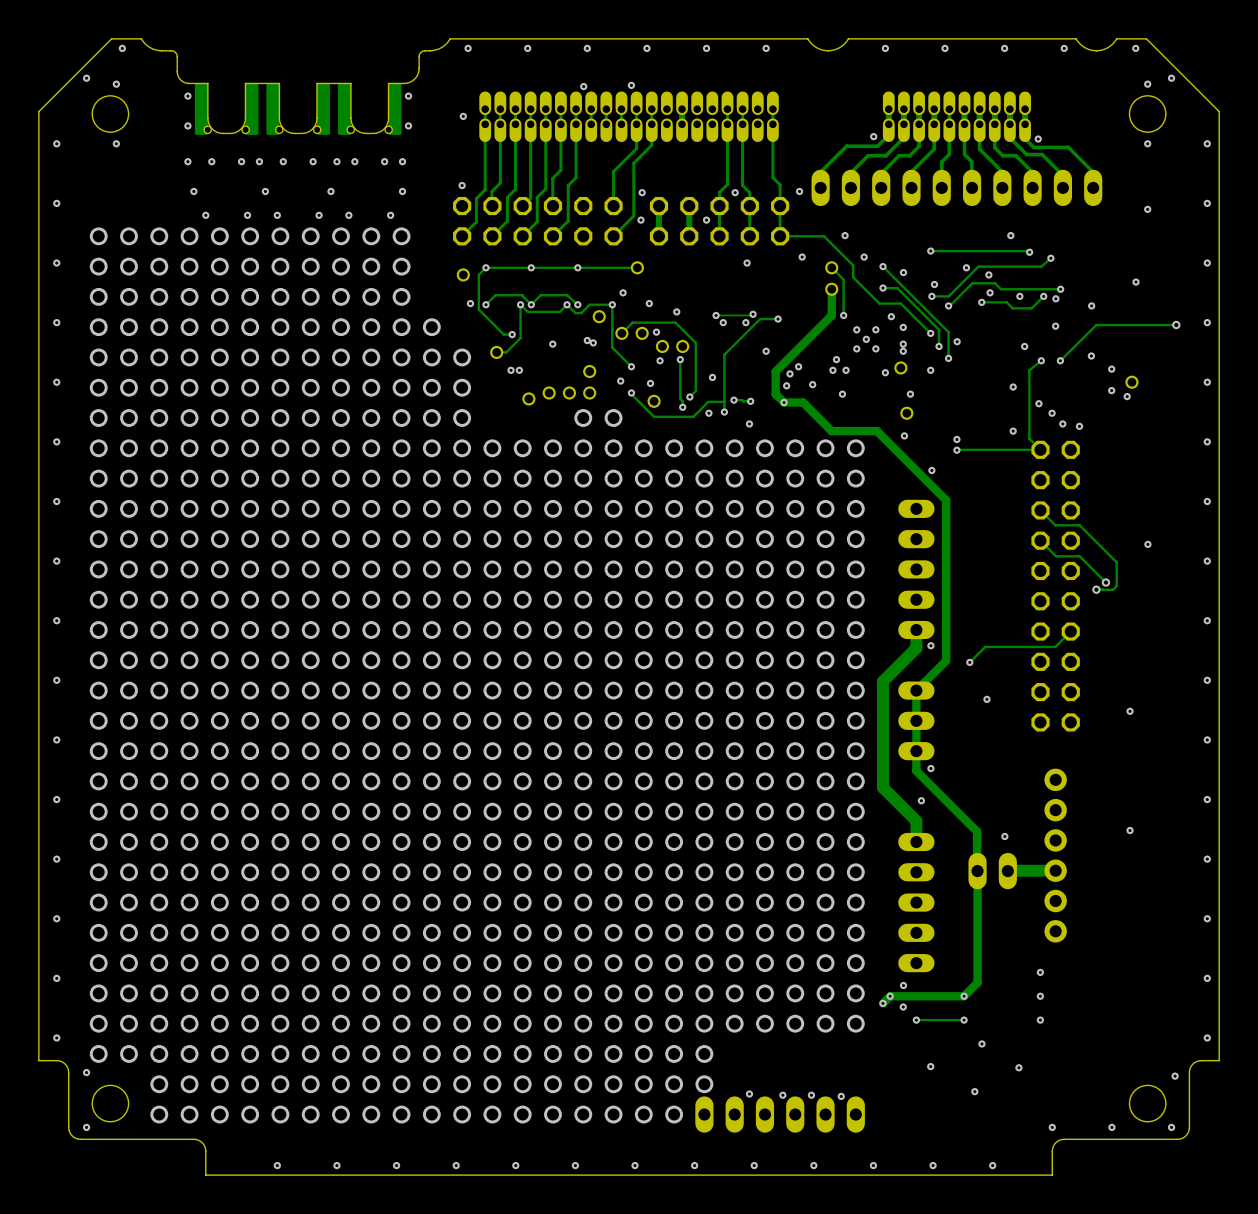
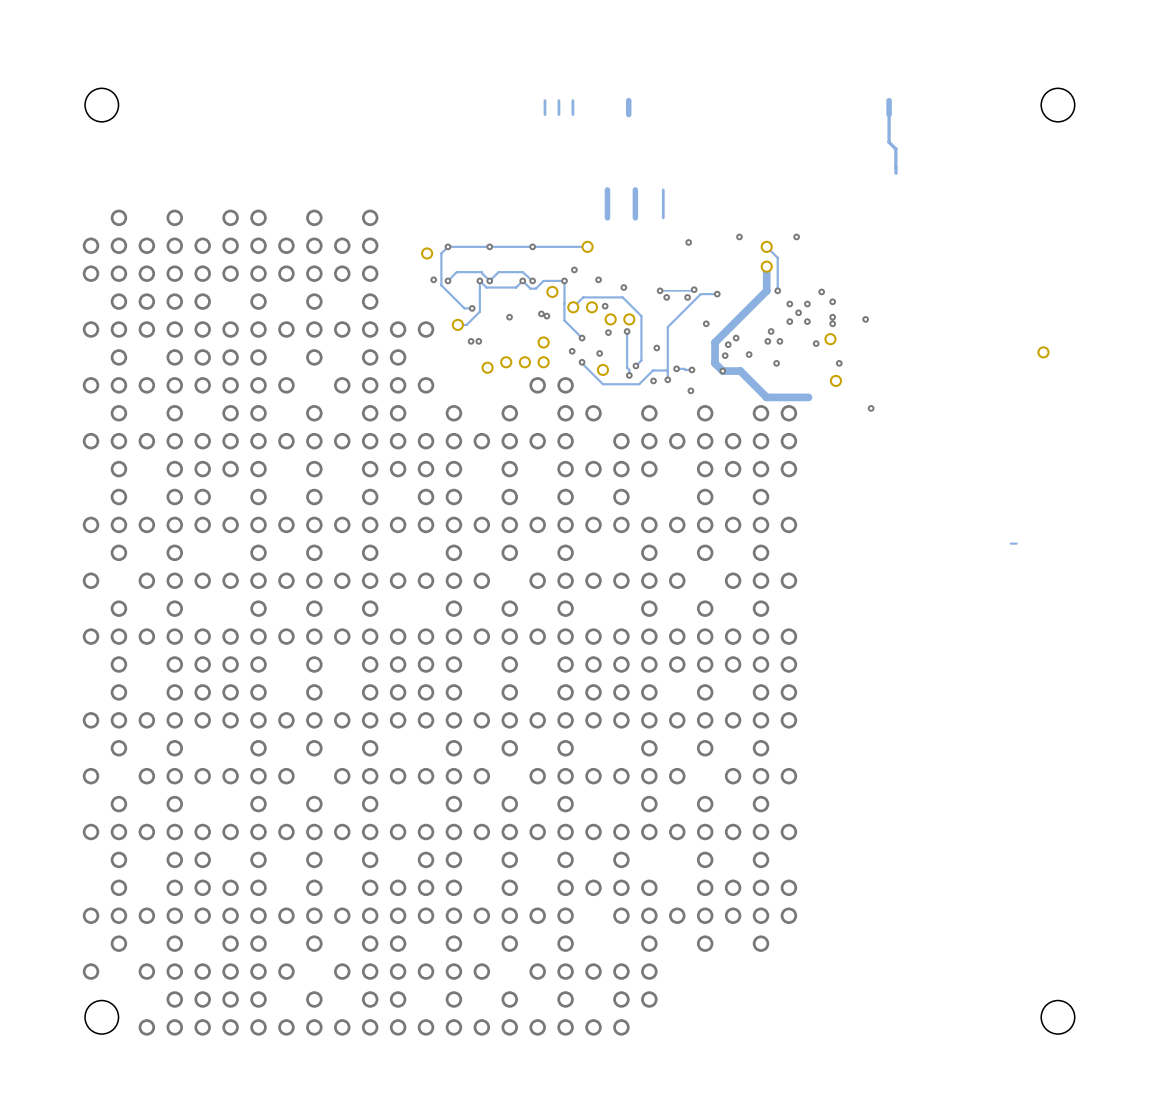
drawing: [38, 38, 1220, 1176] -> none
via: (122, 48) -> none
via: (468, 48) -> none
via: (527, 48) -> none
via: (587, 48) -> none
via: (646, 48) -> none
via: (706, 48) -> none
via: (766, 48) -> none
via: (885, 48) -> none
via: (945, 48) -> none
via: (1004, 48) -> none
via: (1064, 48) -> none
via: (1135, 48) -> none
board edge: (161, 50) (172, 50) (176, 53) (177, 74) (181, 81) (187, 83) (202, 83) -> none
board edge: (429, 50) (423, 51) (419, 53) (418, 72) (414, 79) (407, 82) (393, 83) -> none
via: (86, 78) -> none
via: (1171, 78) -> none
board edge: (274, 83) (250, 83) -> none
board edge: (345, 83) (322, 83) -> none
via: (116, 84) -> none
via: (1147, 84) -> none
via: (631, 85) -> none
via: (583, 86) -> none
via: (187, 96) -> none
via: (408, 96) -> none
part: (226, 109) -> none
part: (298, 109) -> none
part: (369, 109) -> none
track: (485, 109) (485, 189) (476, 198) (476, 222) (462, 236) -> none
track: (500, 109) (500, 183) (491, 191) (492, 206) -> none
track: (515, 109) (515, 189) (507, 197) (507, 221) (492, 236) -> none
track: (530, 109) (530, 198) (522, 206) -> none
track: (545, 109) (545, 188) (537, 197) (537, 221) (522, 236) -> none
track: (560, 109) (560, 170) (552, 178) (552, 206) -> none
track: (576, 109) (576, 177) (568, 185) (568, 221) (552, 236) -> none
track: (636, 109) (636, 148) (613, 171) (613, 206) -> none
track: (651, 109) (651, 145) (633, 163) (633, 216) (613, 236) -> none
track: (727, 109) (727, 184) (719, 192) (719, 205) -> none
track: (742, 109) (742, 185) (749, 192) (749, 236) -> none
track: (772, 109) (772, 177) (780, 184) (780, 236) (824, 236) (853, 265) (853, 277) (879, 303) (900, 303) (930, 333) -> none
track: (888, 109) (888, 135) (877, 146) (846, 146) (820, 172) (820, 187) -> none
track: (903, 109) (903, 137) (885, 155) (868, 155) (850, 173) (850, 187) -> none
track: (919, 109) (919, 146) (909, 155) (899, 155) (881, 173) (881, 187) -> none
track: (934, 109) (934, 149) (911, 171) (911, 187) -> none
track: (949, 109) (949, 154) (941, 161) (941, 187) -> none
track: (979, 109) (979, 149) (1002, 171) (1002, 187) -> none
track: (994, 109) (994, 147) (1002, 155) (1015, 155) (1032, 172) (1032, 187) -> none
track: (1009, 109) (1009, 137) (1026, 154) (1042, 154) (1062, 175) (1062, 187) -> none
track: (1025, 109) (1025, 138) (1033, 147) (1068, 147) (1093, 172) (1093, 187) -> none
via: (463, 116) -> none
part: (629, 116) -> none
part: (956, 116) -> none
via: (187, 125) -> none
via: (408, 125) -> none
via: (873, 136) -> none
via: (1038, 139) -> none
via: (56, 143) -> none
via: (116, 143) -> none
via: (1147, 143) -> none
via: (1207, 143) -> none
via: (187, 161) -> none
via: (211, 161) -> none
via: (241, 161) -> none
via: (259, 161) -> none
via: (283, 161) -> none
via: (313, 161) -> none
via: (336, 161) -> none
via: (354, 161) -> none
via: (384, 161) -> none
via: (402, 161) -> none
via: (462, 185) -> none
part: (956, 187) -> none
via: (193, 191) -> none
via: (265, 191) -> none
via: (330, 191) -> none
via: (402, 191) -> none
via: (799, 191) -> none
via: (642, 192) -> none
via: (735, 192) -> none
via: (56, 203) -> none
via: (1207, 203) -> none
via: (1147, 209) -> none
via: (205, 215) -> none
via: (247, 215) -> none
via: (277, 215) -> none
via: (319, 215) -> none
via: (348, 215) -> none
via: (390, 215) -> none
via: (640, 220) -> none
via: (706, 220) -> none
part: (537, 221) -> none
part: (719, 221) -> none
via: (845, 235) -> none
via: (1010, 235) -> none
via: (98, 236) -> none
via: (159, 236) -> none
via: (219, 236) -> none
via: (310, 236) -> none
via: (371, 236) -> none
track: (930, 251) (1029, 252) -> none
via: (930, 251) -> none
via: (1029, 252) -> none
track: (1050, 258) (1041, 266) (978, 266) (948, 296) (931, 296) -> none
via: (1050, 258) -> none
via: (56, 263) -> none
via: (1207, 263) -> none
track: (883, 266) (948, 332) (948, 358) -> none
via: (883, 266) -> none
via: (966, 267) -> none
via: (903, 272) -> none
via: (988, 274) -> none
via: (1136, 282) -> none
via: (934, 284) -> none
track: (883, 288) (897, 288) (939, 329) (939, 346) -> none
via: (883, 288) -> none
track: (1060, 289) (1001, 289) (995, 283) (972, 283) (948, 305) -> none
via: (1060, 289) -> none
via: (990, 292) -> none
via: (931, 296) -> none
via: (1019, 296) -> none
track: (1043, 296) (1031, 308) (1012, 308) (1006, 302) (981, 302) -> none
via: (1043, 296) -> none
via: (1055, 298) -> none
via: (981, 302) -> none
via: (948, 305) -> none
via: (1091, 305) -> none
via: (56, 322) -> none
via: (1207, 322) -> none
track: (1176, 325) (1096, 325) (1060, 360) -> none
via: (1176, 325) -> none
via: (1055, 326) -> none
via: (98, 327) -> none
via: (250, 327) -> none
via: (310, 327) -> none
via: (371, 327) -> none
via: (431, 327) -> none
via: (930, 333) -> none
via: (957, 341) -> none
via: (1024, 346) -> none
via: (1091, 356) -> none
via: (948, 358) -> none
track: (1041, 360) (1029, 370) (1029, 438) (1040, 449) (956, 450) -> none
via: (1041, 360) -> none
via: (1060, 360) -> none
via: (1111, 369) -> none
via: (930, 370) -> none
via: (56, 382) -> none
via: (1207, 382) -> none
via: (98, 387) -> none
via: (159, 387) -> none
via: (310, 387) -> none
via: (371, 387) -> none
via: (462, 387) -> none
via: (1013, 387) -> none
via: (1111, 390) -> none
via: (1127, 396) -> none
via: (1038, 403) -> none
via: (1052, 413) -> none
via: (341, 418) -> none
via: (1062, 423) -> none
via: (1079, 426) -> none
track: (877, 431) (946, 500) (946, 660) (916, 690) (916, 770) (977, 831) (977, 982) (964, 996) (890, 996) (883, 1003) -> none
via: (1013, 431) -> none
via: (904, 435) -> none
via: (956, 439) -> none
via: (56, 441) -> none
via: (1207, 441) -> none
via: none -> (871, 408)
via: (98, 448) -> none
via: (159, 448) -> none
via: (219, 448) -> none
via: (310, 448) -> none
via: (371, 448) -> none
via: (462, 448) -> none
via: (522, 448) -> none
via: (583, 448) -> none
via: (674, 448) -> none
via: (734, 448) -> none
via: (795, 448) -> none
via: (956, 450) -> none
via: (931, 470) -> none
via: (643, 478) -> none
via: (56, 501) -> none
via: (1207, 501) -> none
via: (98, 508) -> none
via: (159, 508) -> none
via: (310, 508) -> none
via: (371, 508) -> none
via: (522, 508) -> none
via: (583, 508) -> none
via: (734, 508) -> none
track: (1040, 510) (1055, 525) (1079, 525) (1116, 562) (1116, 586) (1113, 589) (1102, 589) -> none
via: (98, 539) -> none
via: (159, 539) -> none
via: (250, 539) -> none
via: (310, 539) -> none
via: (371, 539) -> none
via: (431, 539) -> none
via: (522, 539) -> none
via: (583, 539) -> none
via: (643, 539) -> none
via: (704, 539) -> none
via: (734, 539) -> none
via: (795, 539) -> none
via: (855, 539) -> none
track: (1040, 540) (1056, 556) (1079, 556) (1105, 582) -> none
via: (1147, 544) -> none
via: (56, 561) -> none
via: (1207, 561) -> none
part: (916, 569) -> none
via: (1105, 582) -> none
part: (1055, 586) -> none
via: (1096, 589) -> none
via: (98, 599) -> none
via: (159, 599) -> none
via: (219, 599) -> none
via: (250, 599) -> none
via: (310, 599) -> none
via: (371, 599) -> none
via: (431, 599) -> none
via: (462, 599) -> none
via: (522, 599) -> none
via: (583, 599) -> none
via: (643, 599) -> none
via: (674, 599) -> none
via: (734, 599) -> none
via: (795, 599) -> none
via: (855, 599) -> none
via: (56, 620) -> none
via: (1207, 620) -> none
via: (129, 630) -> none
via: (552, 630) -> none
via: (764, 630) -> none
track: (916, 630) (916, 648) (883, 681) (883, 787) (916, 821) (916, 841) -> none
track: (1070, 631) (1055, 646) (985, 646) (969, 662) -> none
via: (930, 645) -> none
via: (98, 660) -> none
via: (159, 660) -> none
via: (219, 660) -> none
via: (250, 660) -> none
via: (310, 660) -> none
via: (371, 660) -> none
via: (431, 660) -> none
via: (462, 660) -> none
via: (522, 660) -> none
via: (583, 660) -> none
via: (643, 660) -> none
via: (674, 660) -> none
via: (734, 660) -> none
via: (795, 660) -> none
via: (855, 660) -> none
via: (969, 662) -> none
via: (56, 680) -> none
via: (1207, 680) -> none
via: (986, 699) -> none
via: (1130, 711) -> none
via: (98, 720) -> none
via: (159, 720) -> none
via: (310, 720) -> none
via: (371, 720) -> none
via: (522, 720) -> none
via: (583, 720) -> none
part: (916, 720) -> none
via: (56, 739) -> none
via: (1207, 739) -> none
via: (98, 751) -> none
via: (159, 751) -> none
via: (310, 751) -> none
via: (371, 751) -> none
via: (522, 751) -> none
via: (583, 751) -> none
via: (734, 751) -> none
via: (795, 751) -> none
via: (930, 768) -> none
via: (56, 799) -> none
via: (1207, 799) -> none
via: (921, 800) -> none
via: (98, 811) -> none
via: (159, 811) -> none
via: (219, 811) -> none
via: (250, 811) -> none
via: (310, 811) -> none
via: (371, 811) -> none
via: (431, 811) -> none
via: (462, 811) -> none
via: (522, 811) -> none
via: (583, 811) -> none
via: (643, 811) -> none
via: (674, 811) -> none
via: (734, 811) -> none
via: (795, 811) -> none
via: (855, 811) -> none
via: (1130, 830) -> none
via: (1004, 836) -> none
via: (129, 841) -> none
via: (341, 841) -> none
via: (552, 841) -> none
via: (764, 841) -> none
part: (1055, 855) -> none
via: (56, 859) -> none
via: (1207, 859) -> none
track: (1055, 870) (1007, 871) -> none
part: (992, 871) -> none
via: (98, 872) -> none
via: (159, 872) -> none
via: (219, 872) -> none
via: (250, 872) -> none
via: (310, 872) -> none
via: (371, 872) -> none
via: (431, 872) -> none
via: (462, 872) -> none
via: (522, 872) -> none
via: (583, 872) -> none
via: (643, 872) -> none
via: (674, 872) -> none
via: (734, 872) -> none
via: (795, 872) -> none
via: (855, 872) -> none
part: (916, 902) -> none
via: (56, 918) -> none
via: (1207, 918) -> none
via: (98, 932) -> none
via: (159, 932) -> none
via: (250, 932) -> none
via: (310, 932) -> none
via: (371, 932) -> none
via: (431, 932) -> none
via: (522, 932) -> none
via: (583, 932) -> none
via: (643, 932) -> none
via: (704, 932) -> none
via: (734, 932) -> none
via: (795, 932) -> none
via: (855, 932) -> none
via: (98, 963) -> none
via: (159, 963) -> none
via: (310, 963) -> none
via: (371, 963) -> none
via: (522, 963) -> none
via: (583, 963) -> none
via: (734, 963) -> none
via: (1040, 972) -> none
via: (56, 978) -> none
via: (1207, 978) -> none
via: (903, 985) -> none
via: (643, 993) -> none
via: (890, 996) -> none
via: (964, 996) -> none
via: (1040, 996) -> none
via: (883, 1003) -> none
via: (903, 1006) -> none
via: (916, 1020) -> none
track: (964, 1020) (916, 1020) -> none
via: (964, 1020) -> none
via: (1040, 1020) -> none
via: (98, 1023) -> none
via: (159, 1023) -> none
via: (219, 1023) -> none
via: (310, 1023) -> none
via: (371, 1023) -> none
via: (462, 1023) -> none
via: (522, 1023) -> none
via: (583, 1023) -> none
via: (643, 1023) -> none
via: (674, 1023) -> none
via: (734, 1023) -> none
via: (795, 1023) -> none
via: (855, 1023) -> none
via: (56, 1037) -> none
via: (1207, 1037) -> none
via: (981, 1043) -> none
via: (129, 1053) -> none
via: (341, 1053) -> none
via: (552, 1053) -> none
via: (930, 1066) -> none
via: (1018, 1067) -> none
via: (86, 1072) -> none
via: (1175, 1076) -> none
via: (159, 1084) -> none
via: (310, 1084) -> none
via: (371, 1084) -> none
via: (462, 1084) -> none
via: (522, 1084) -> none
via: (583, 1084) -> none
via: (643, 1084) -> none
via: (974, 1091) -> none
via: (749, 1094) -> none
via: (782, 1095) -> none
via: (811, 1095) -> none
via: (841, 1096) -> none
part: (780, 1114) -> none
via: (86, 1127) -> none
via: (1052, 1127) -> none
via: (1111, 1127) -> none
via: (1171, 1127) -> none
via: (277, 1165) -> none
via: (336, 1165) -> none
via: (396, 1165) -> none
via: (456, 1165) -> none
via: (515, 1165) -> none
via: (575, 1165) -> none
via: (635, 1165) -> none
via: (694, 1165) -> none
via: (754, 1165) -> none
via: (813, 1165) -> none
via: (873, 1165) -> none
via: (933, 1165) -> none
via: (992, 1165) -> none

